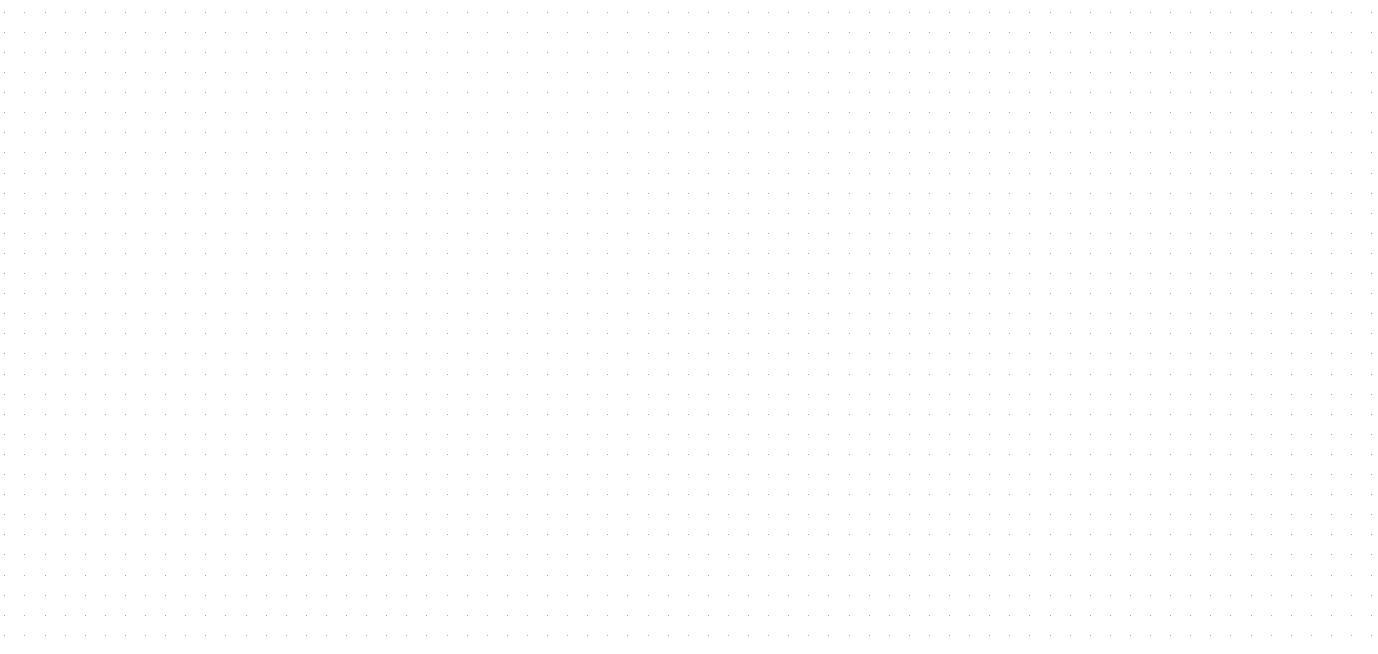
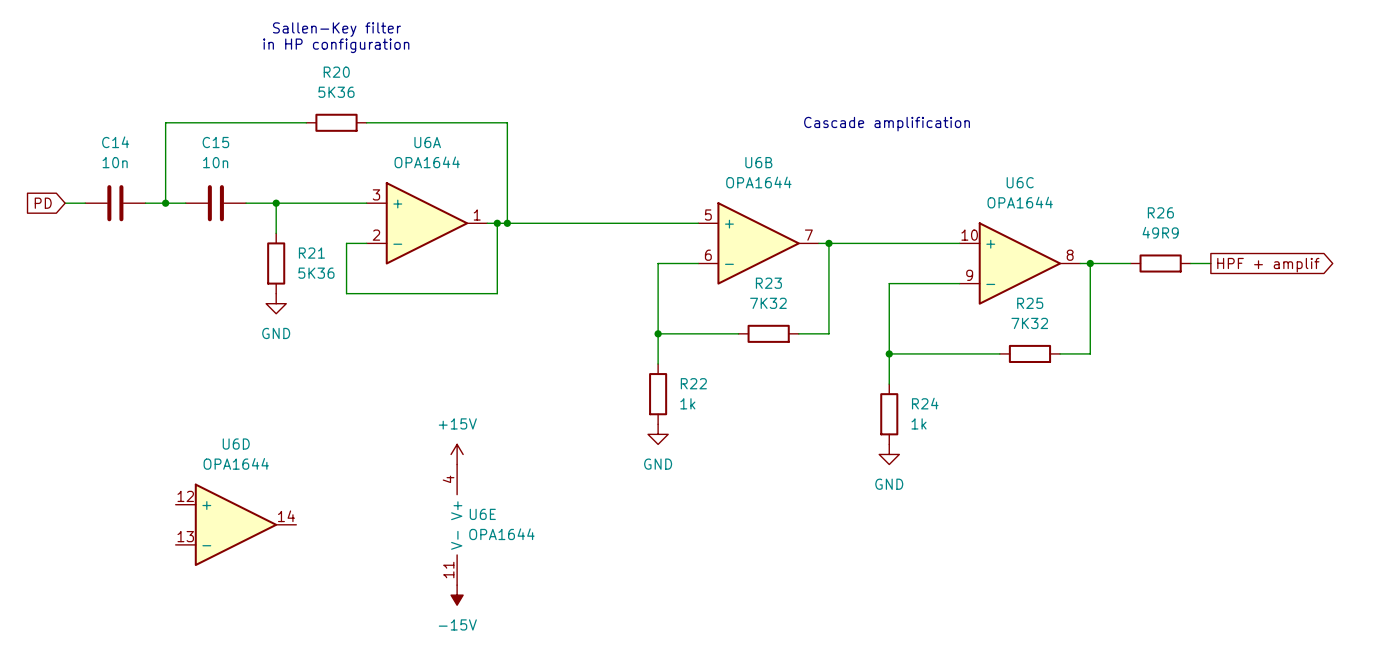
text: none -> Sallen-Key filter (336, 29)
text: none -> in HP configuration (336, 45)
wire: none -> (306, 122) (165, 122) (165, 203)
R20: none -> 5K36 (336, 122)
wire: none -> (366, 122) (507, 122) (507, 223)
text: none -> Cascade amplification (887, 124)
global label: none -> PD (43, 203)
wire: none -> (65, 203) (85, 203)
C14: none -> 10n (115, 203)
wire: none -> (145, 203) (185, 203)
junction: none -> (165, 203)
C15: none -> 10n (215, 203)
wire: none -> (246, 203) (366, 203)
wire: none -> (276, 203) (276, 233)
junction: none -> (276, 203)
U6A: none -> OPA1644 (426, 223)
wire: none -> (487, 223) (698, 223)
wire: none -> (497, 223) (497, 293) (346, 293) (346, 243) (366, 243)
junction: none -> (497, 223)
junction: none -> (507, 223)
U6B: none -> OPA1644 (758, 243)
wire: none -> (818, 243) (959, 243)
wire: none -> (828, 243) (828, 333) (798, 333)
junction: none -> (828, 243)
R21: none -> 5K36 (276, 263)
wire: none -> (698, 263) (658, 263) (658, 364)
U6C: none -> OPA1644 (1019, 263)
wire: none -> (1080, 263) (1130, 263)
wire: none -> (1090, 263) (1090, 353) (1060, 353)
junction: none -> (1090, 263)
R26: none -> 49R9 (1160, 263)
wire: none -> (1190, 263) (1210, 263)
global label: none -> HPF + amplif (1268, 265)
wire: none -> (959, 283) (889, 283) (889, 384)
power symbol: none -> GND (276, 303)
wire: none -> (658, 333) (738, 333)
junction: none -> (658, 333)
R23: none -> 7K32 (768, 333)
wire: none -> (889, 353) (999, 353)
junction: none -> (889, 353)
R25: none -> 7K32 (1029, 353)
R22: none -> 1k (658, 394)
R24: none -> 1k (889, 414)
power symbol: none -> GND (658, 434)
power symbol: none -> +15V (457, 454)
power symbol: none -> GND (889, 454)
U6D: none -> OPA1644 (235, 524)
U6E: none -> OPA1644 (457, 524)
power symbol: none -> -15V (457, 595)

